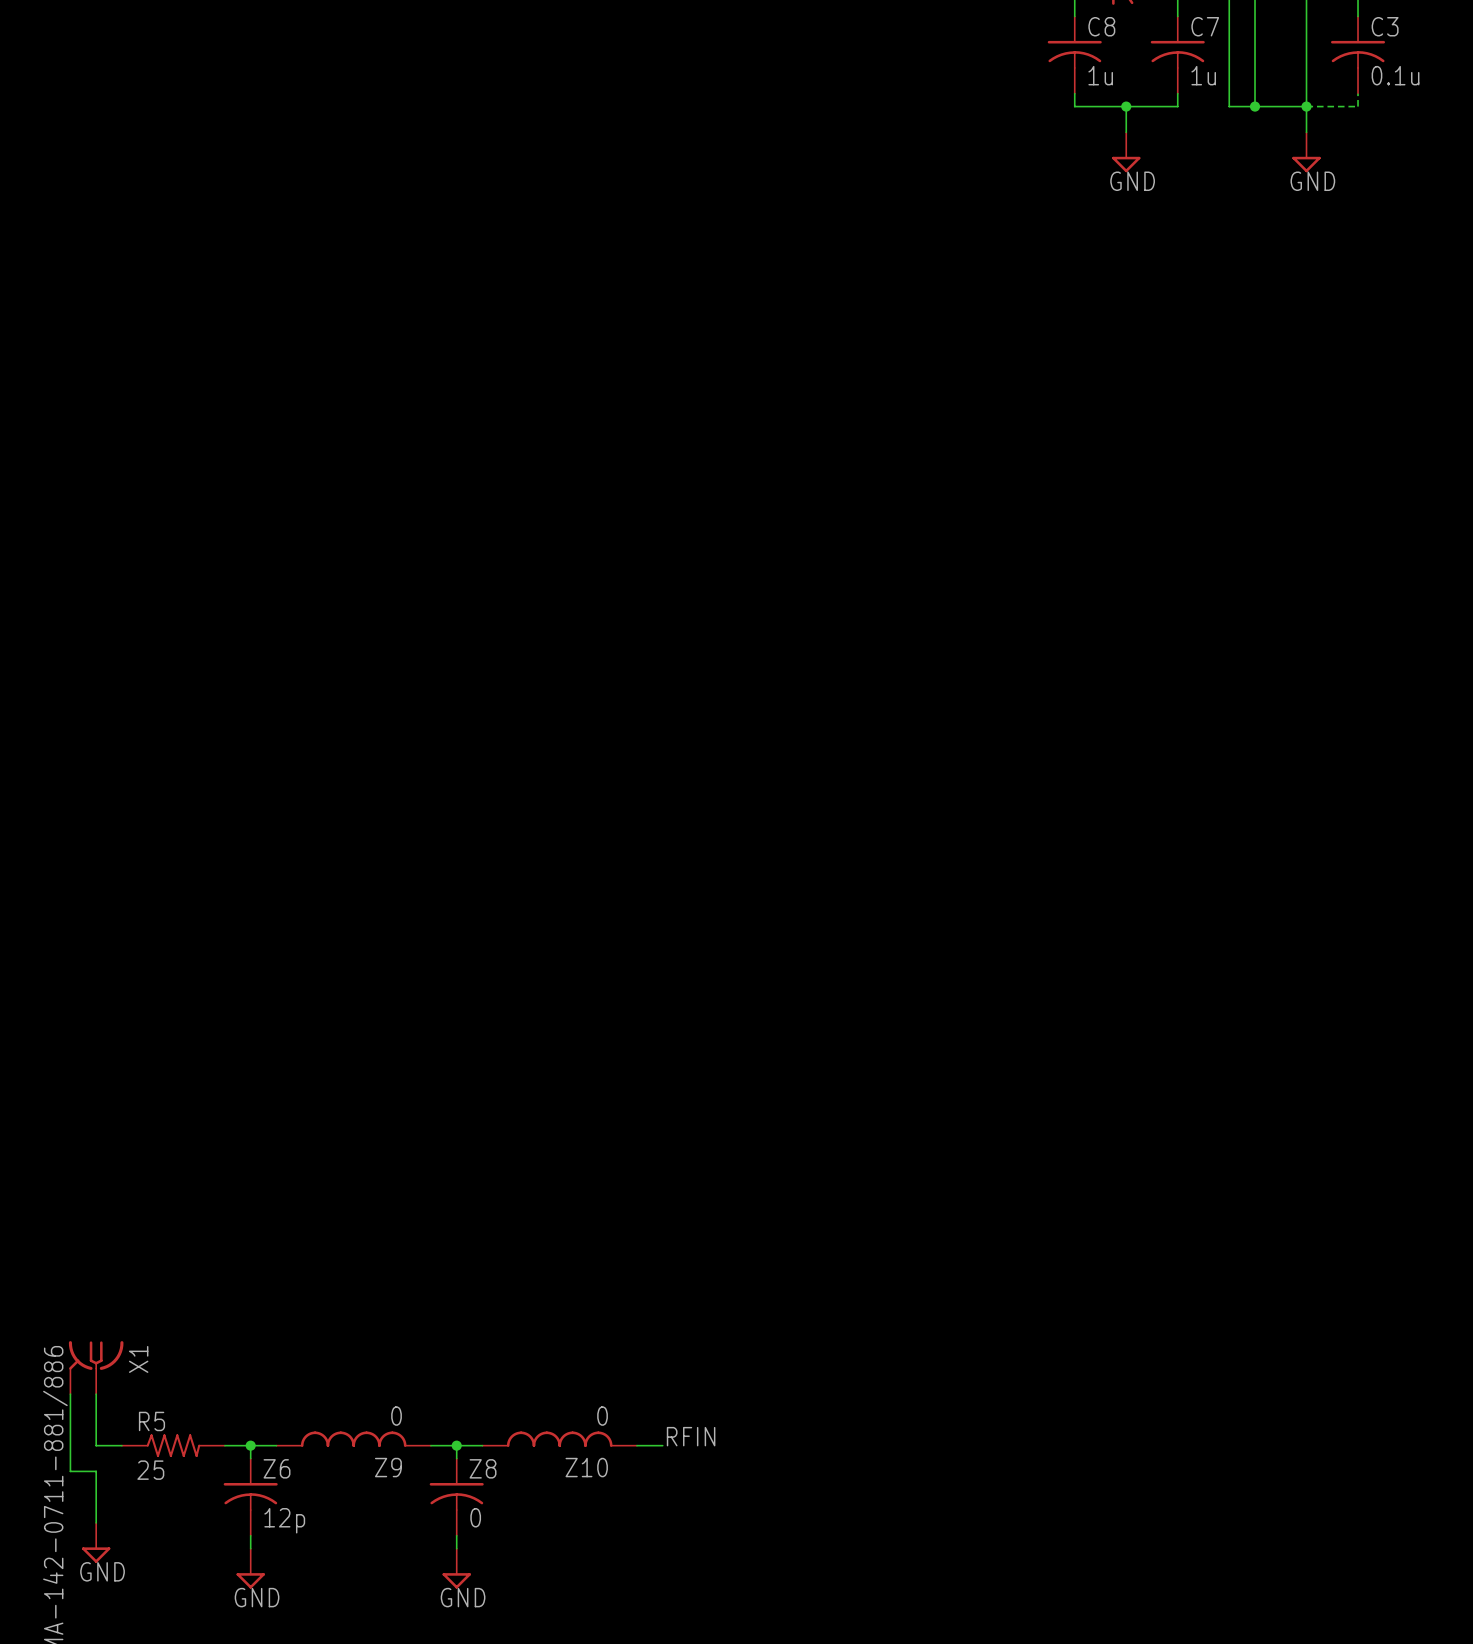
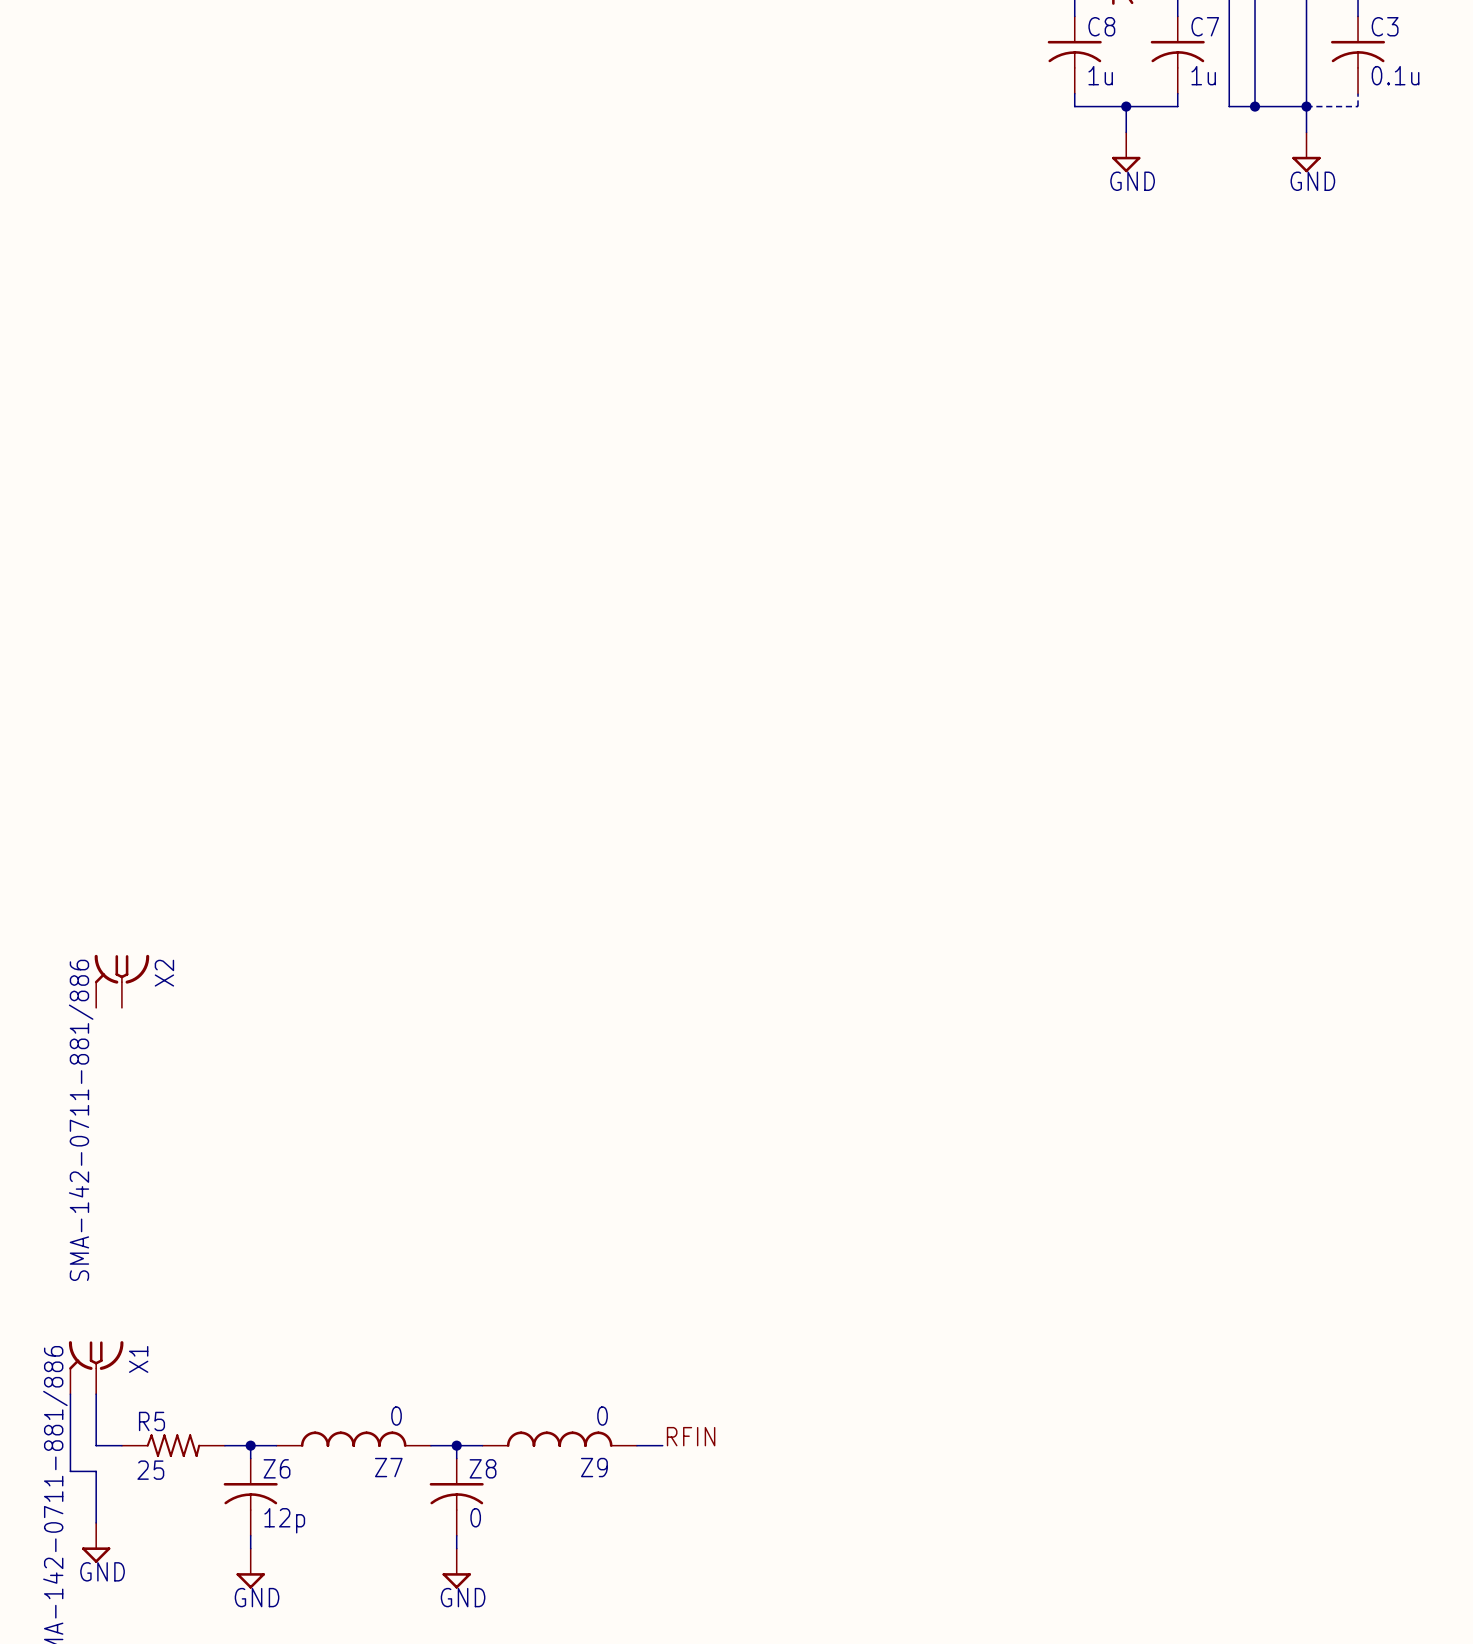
X2: none -> SMA-142-0711-881/886 (121, 981)
Z9 name: Z9 (388, 1467) -> Z7 (388, 1467)
Z10 name: Z10 (586, 1467) -> Z9 (594, 1467)

